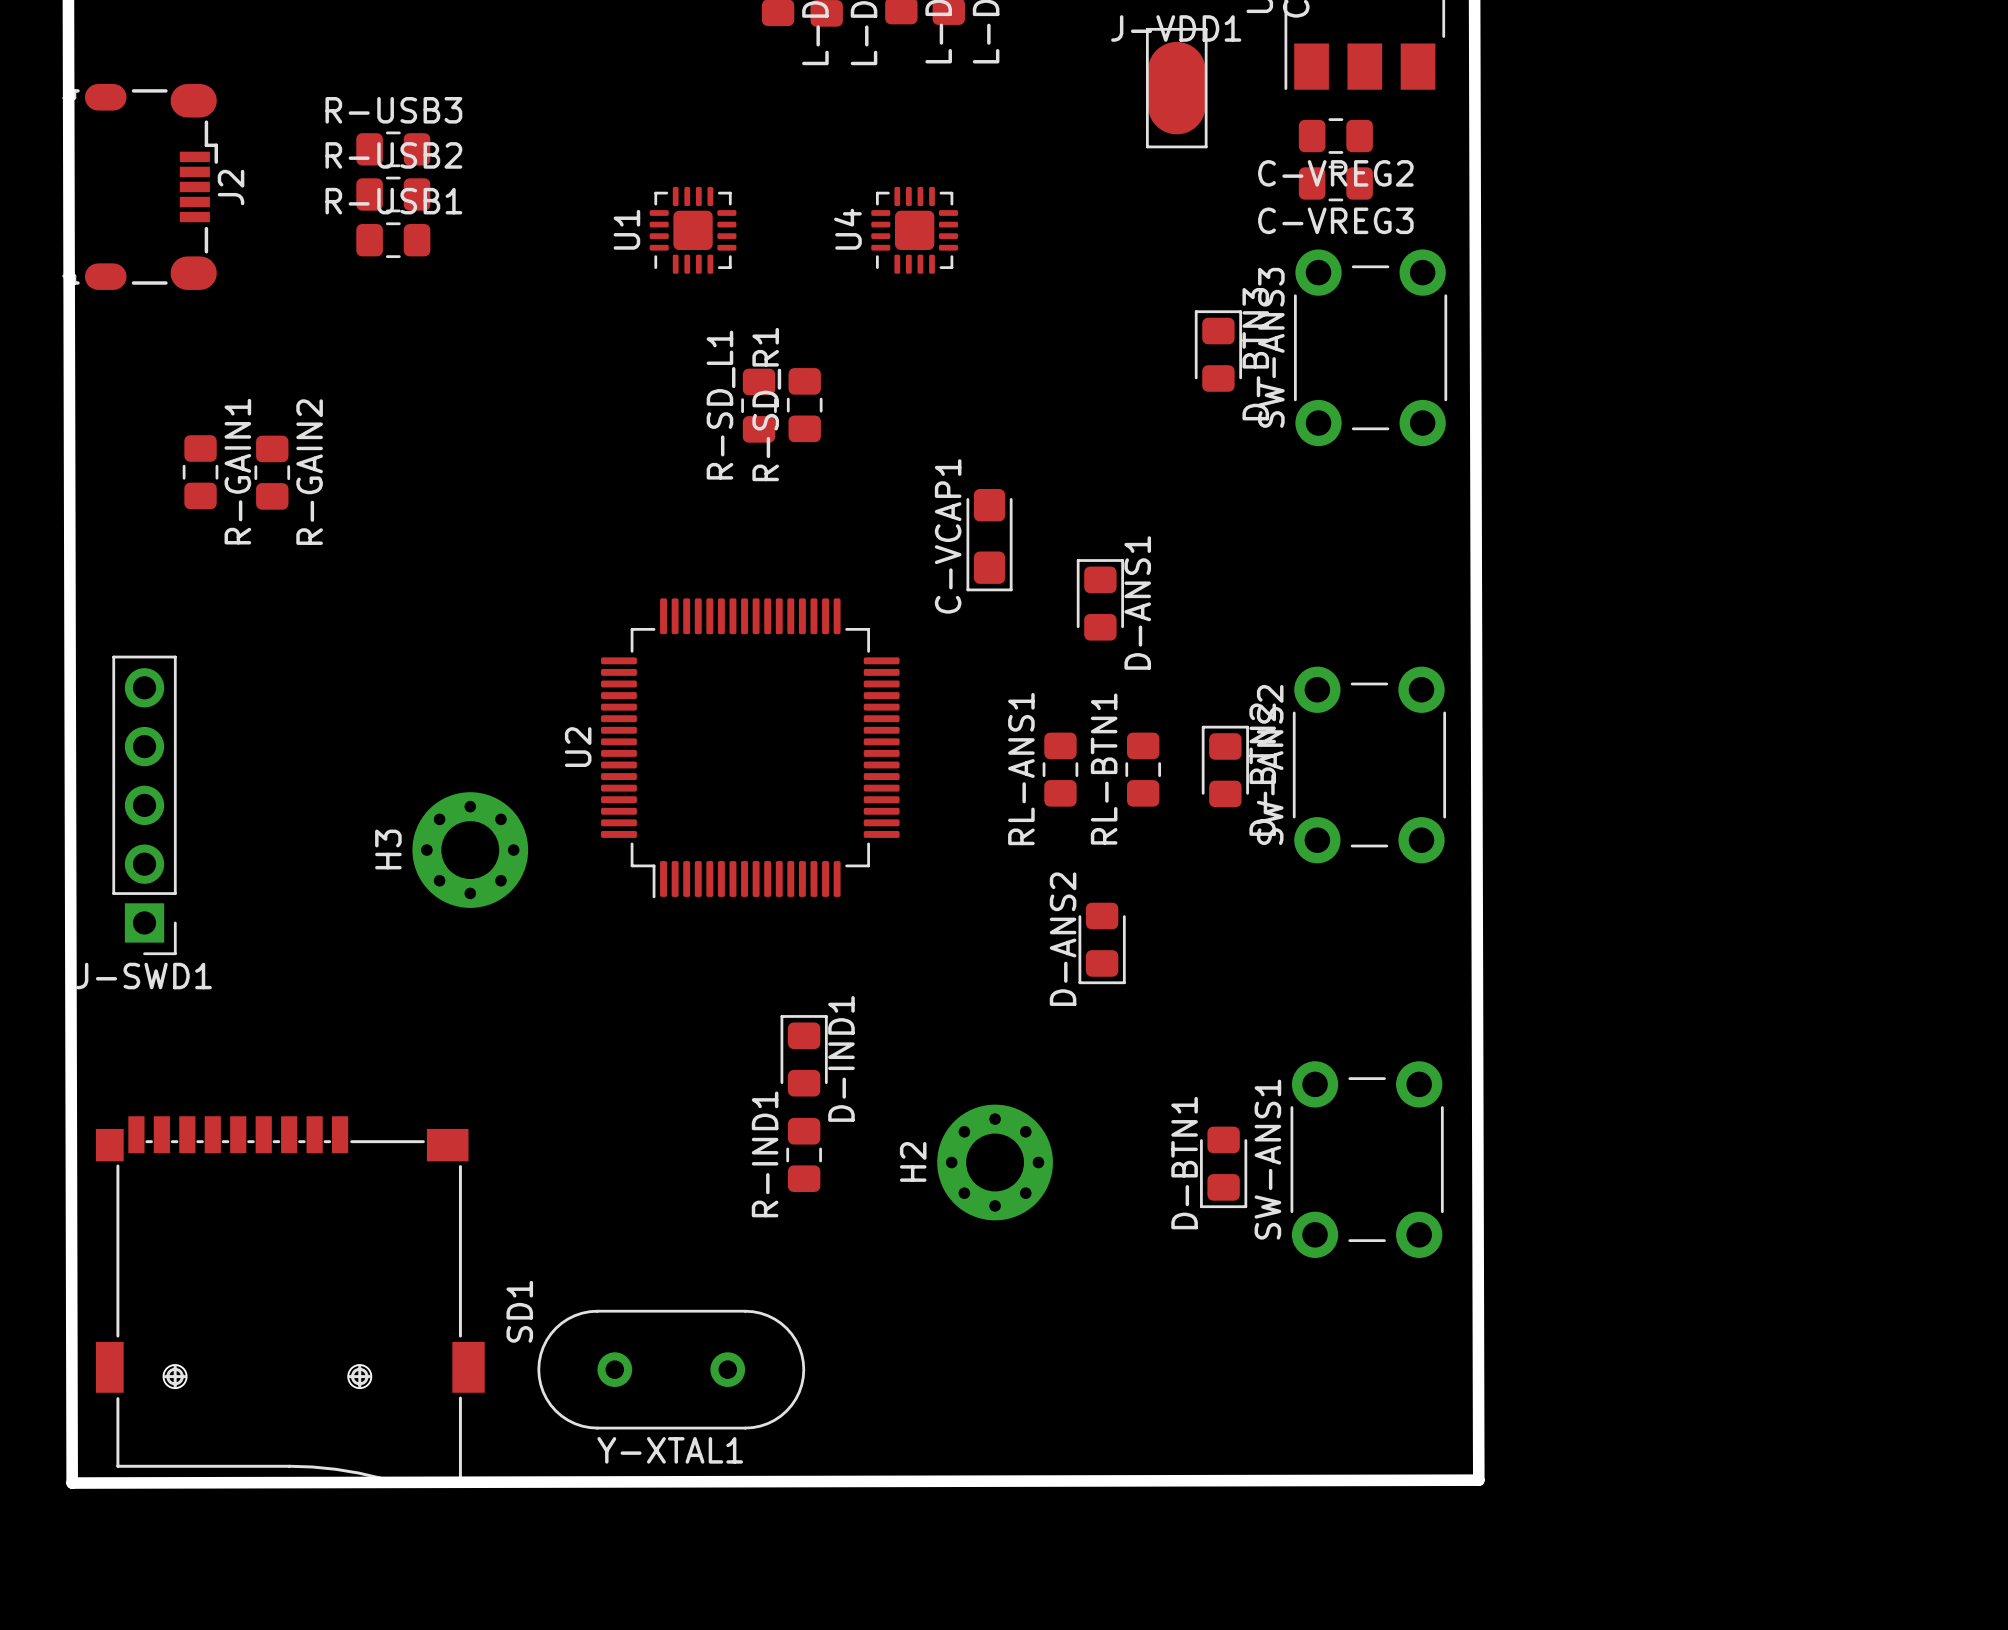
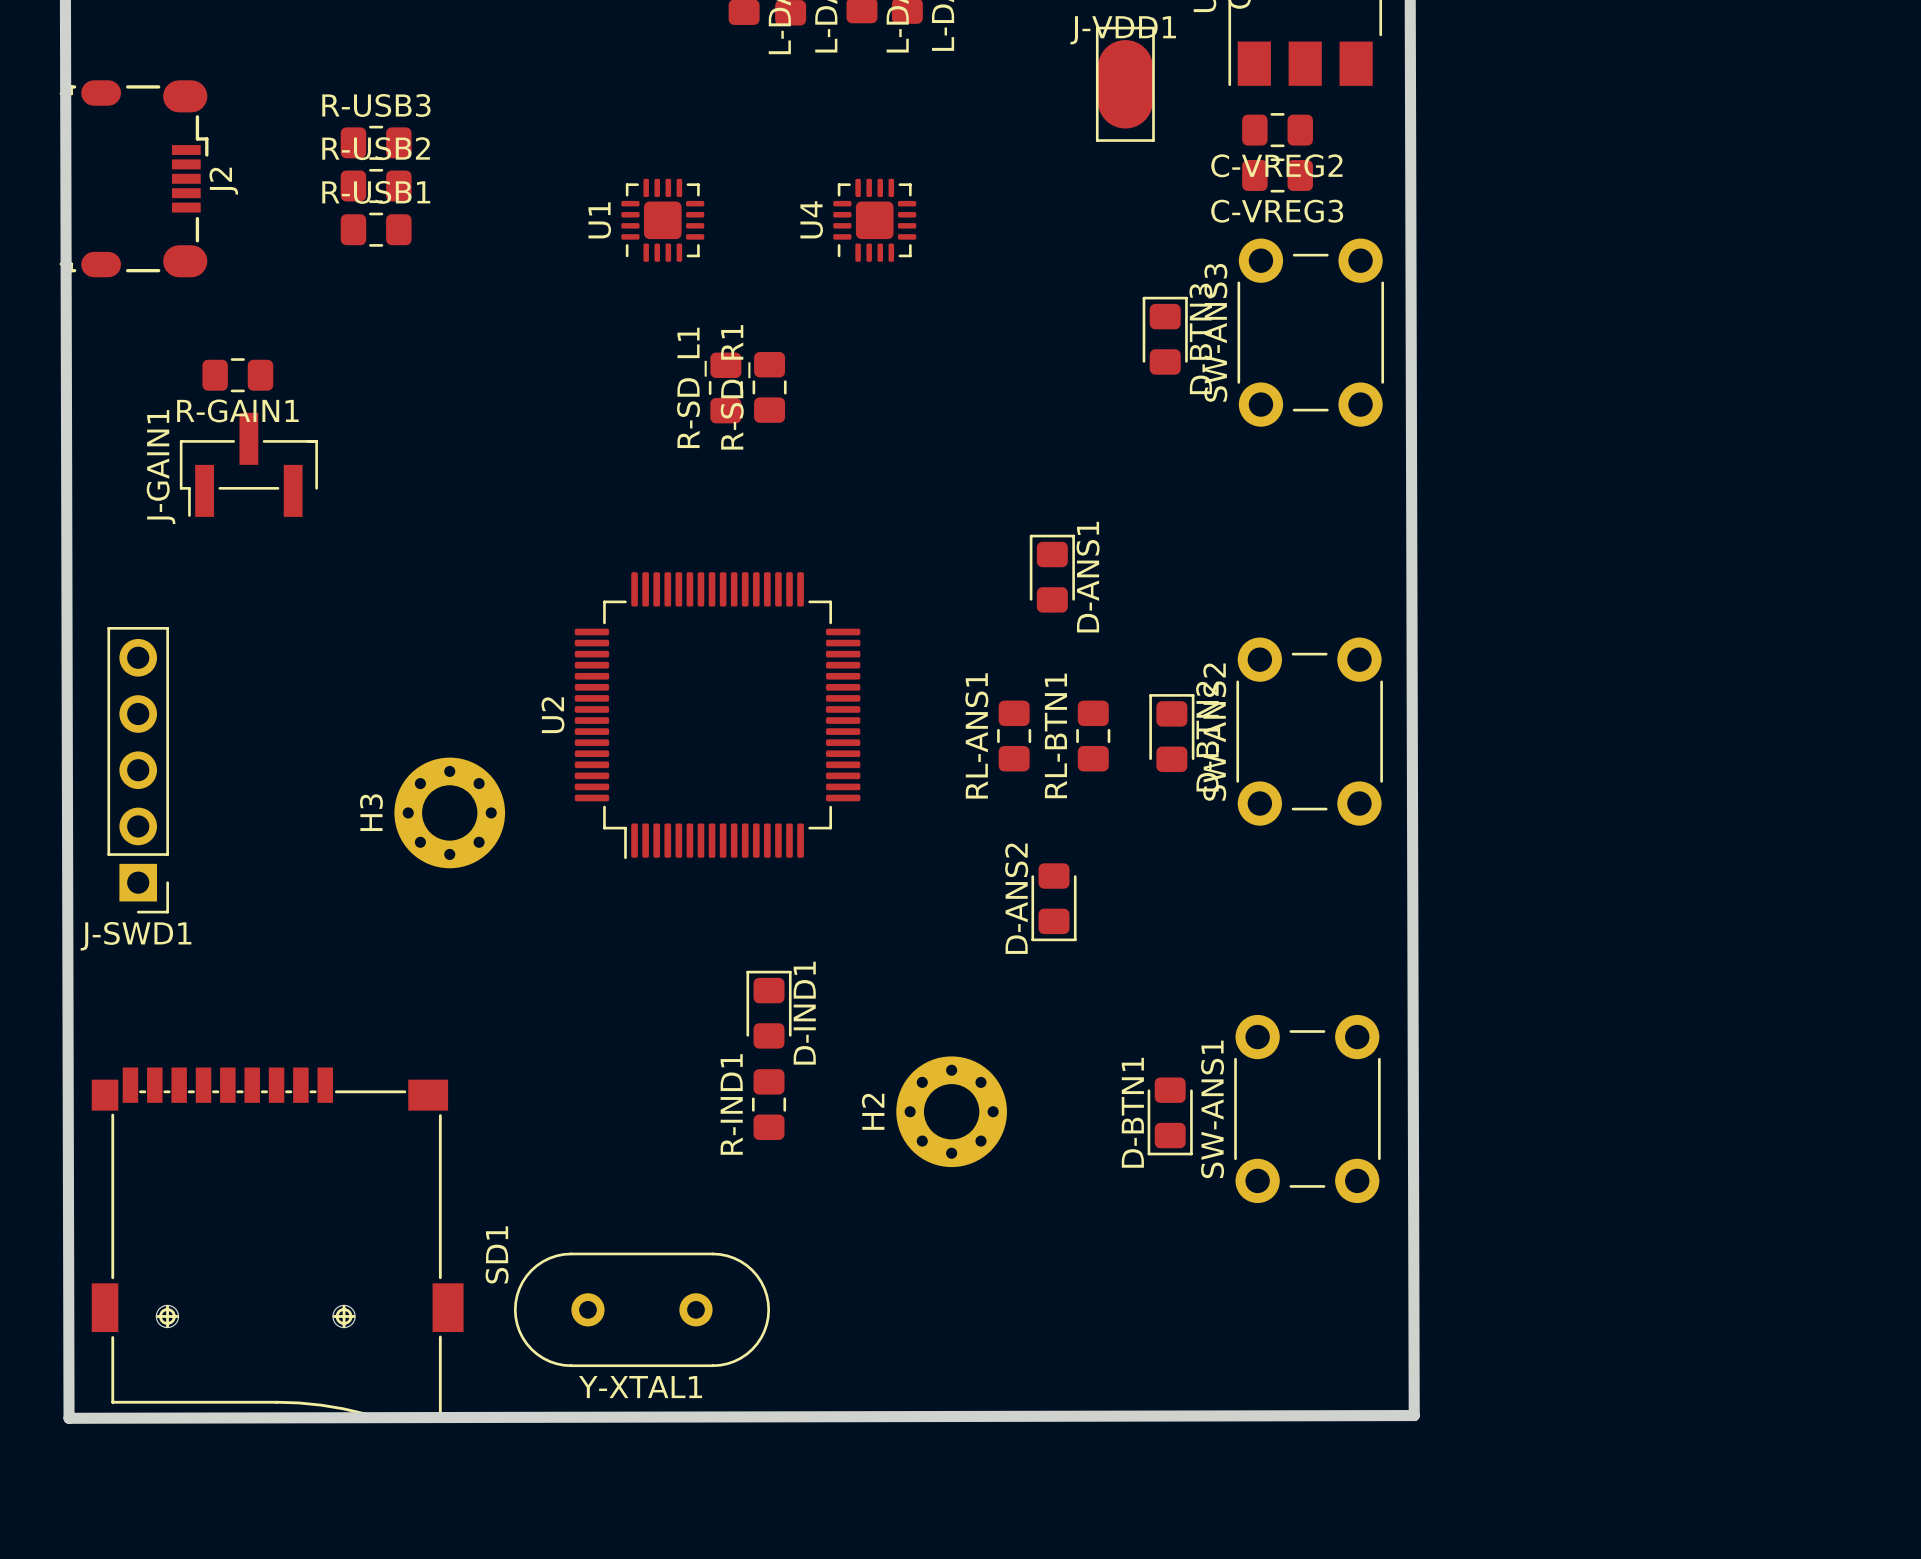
R-GAIN1 rotation: 0° (200, 472) -> 90° clockwise (237, 375)
R-GAIN1 position: (200, 472) -> (237, 375)
R-GAIN2: (272, 472) -> none
J-GAIN1: none -> (248, 464)
C-VCAP1: (989, 540) -> none

